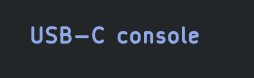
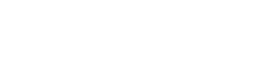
text: USB-C console (115, 34) -> none

